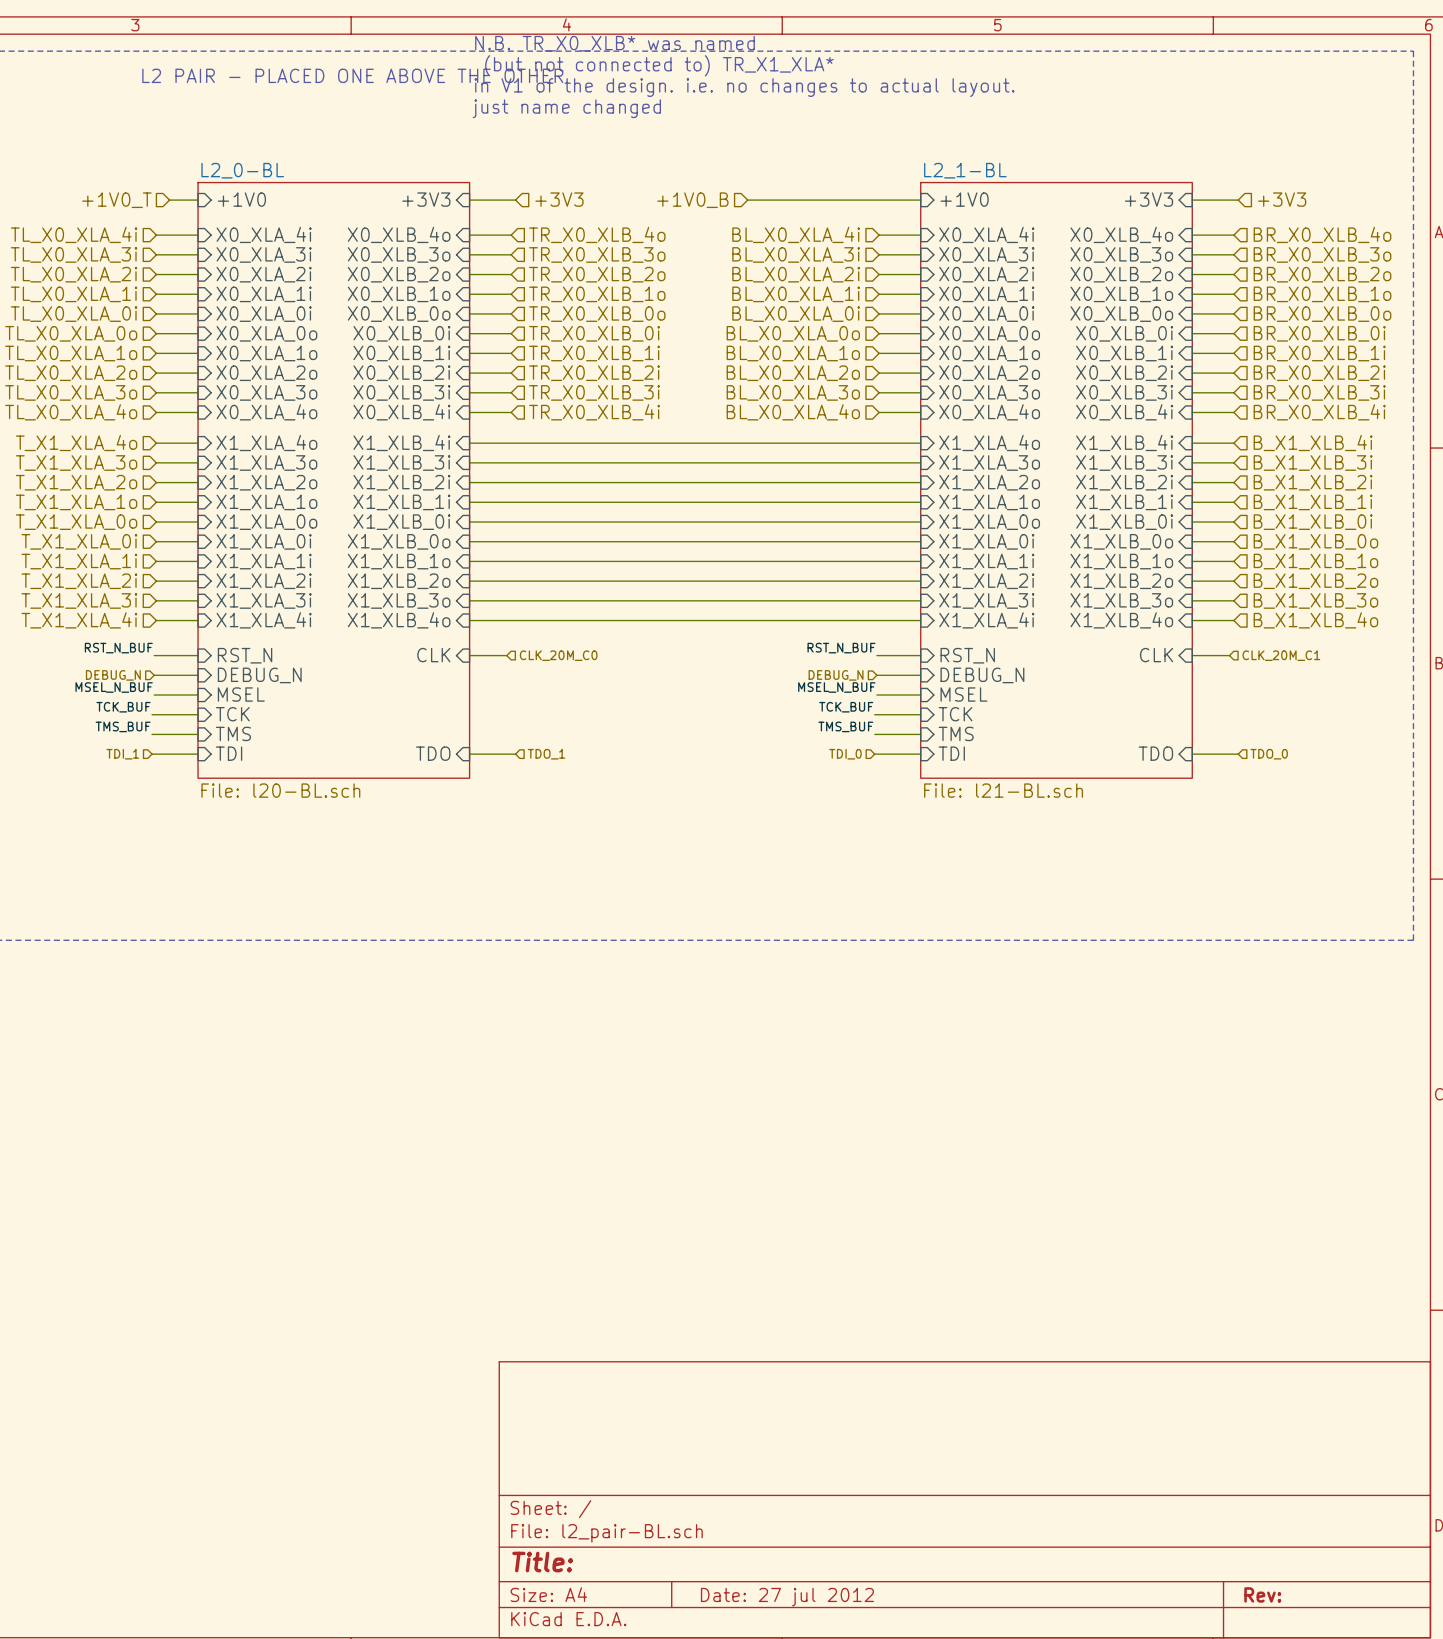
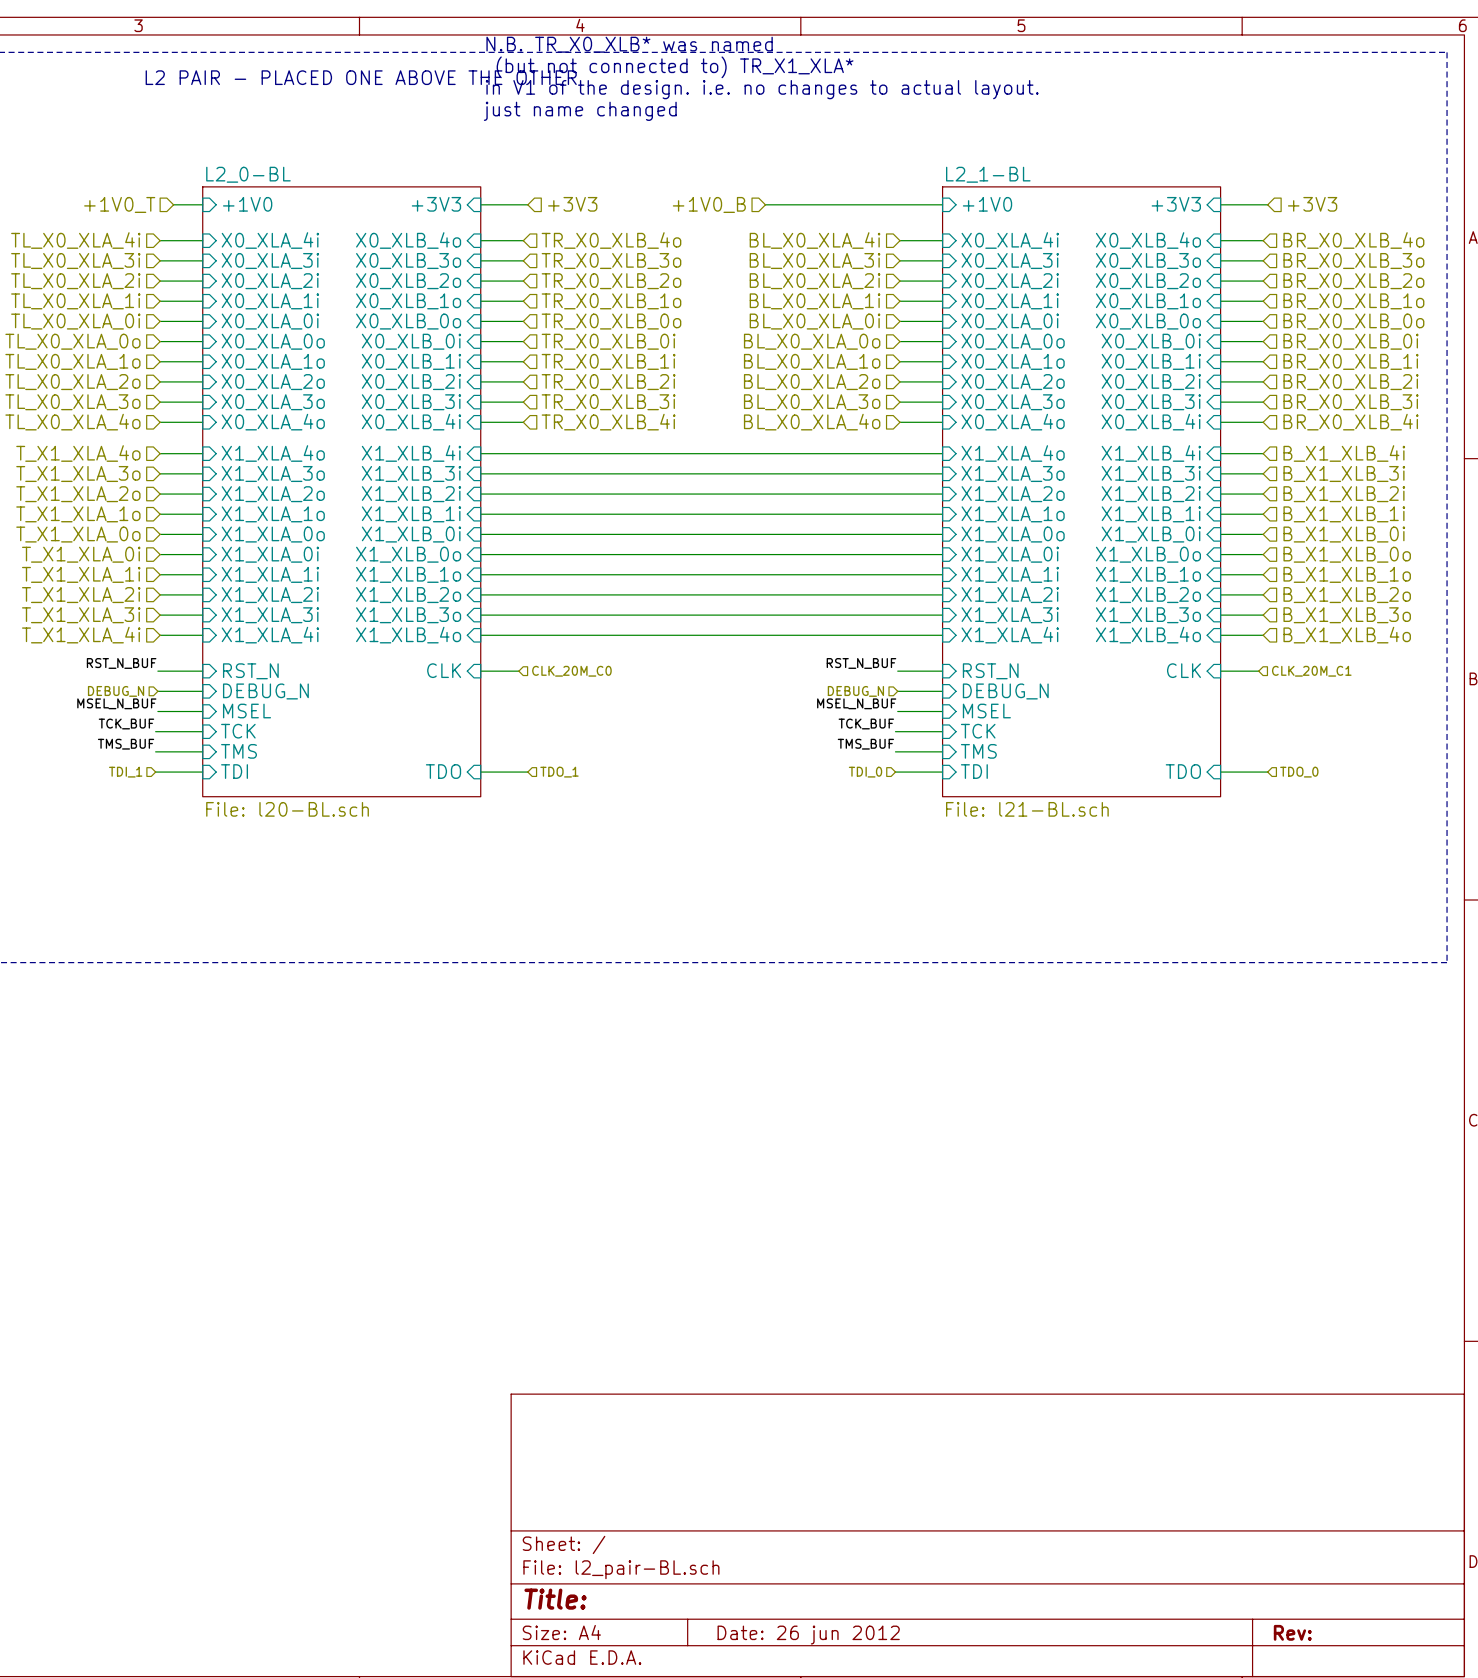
title block: Date: 27 jul 2012 (787, 1597) -> Date: 26 jun 2012 (808, 1635)

